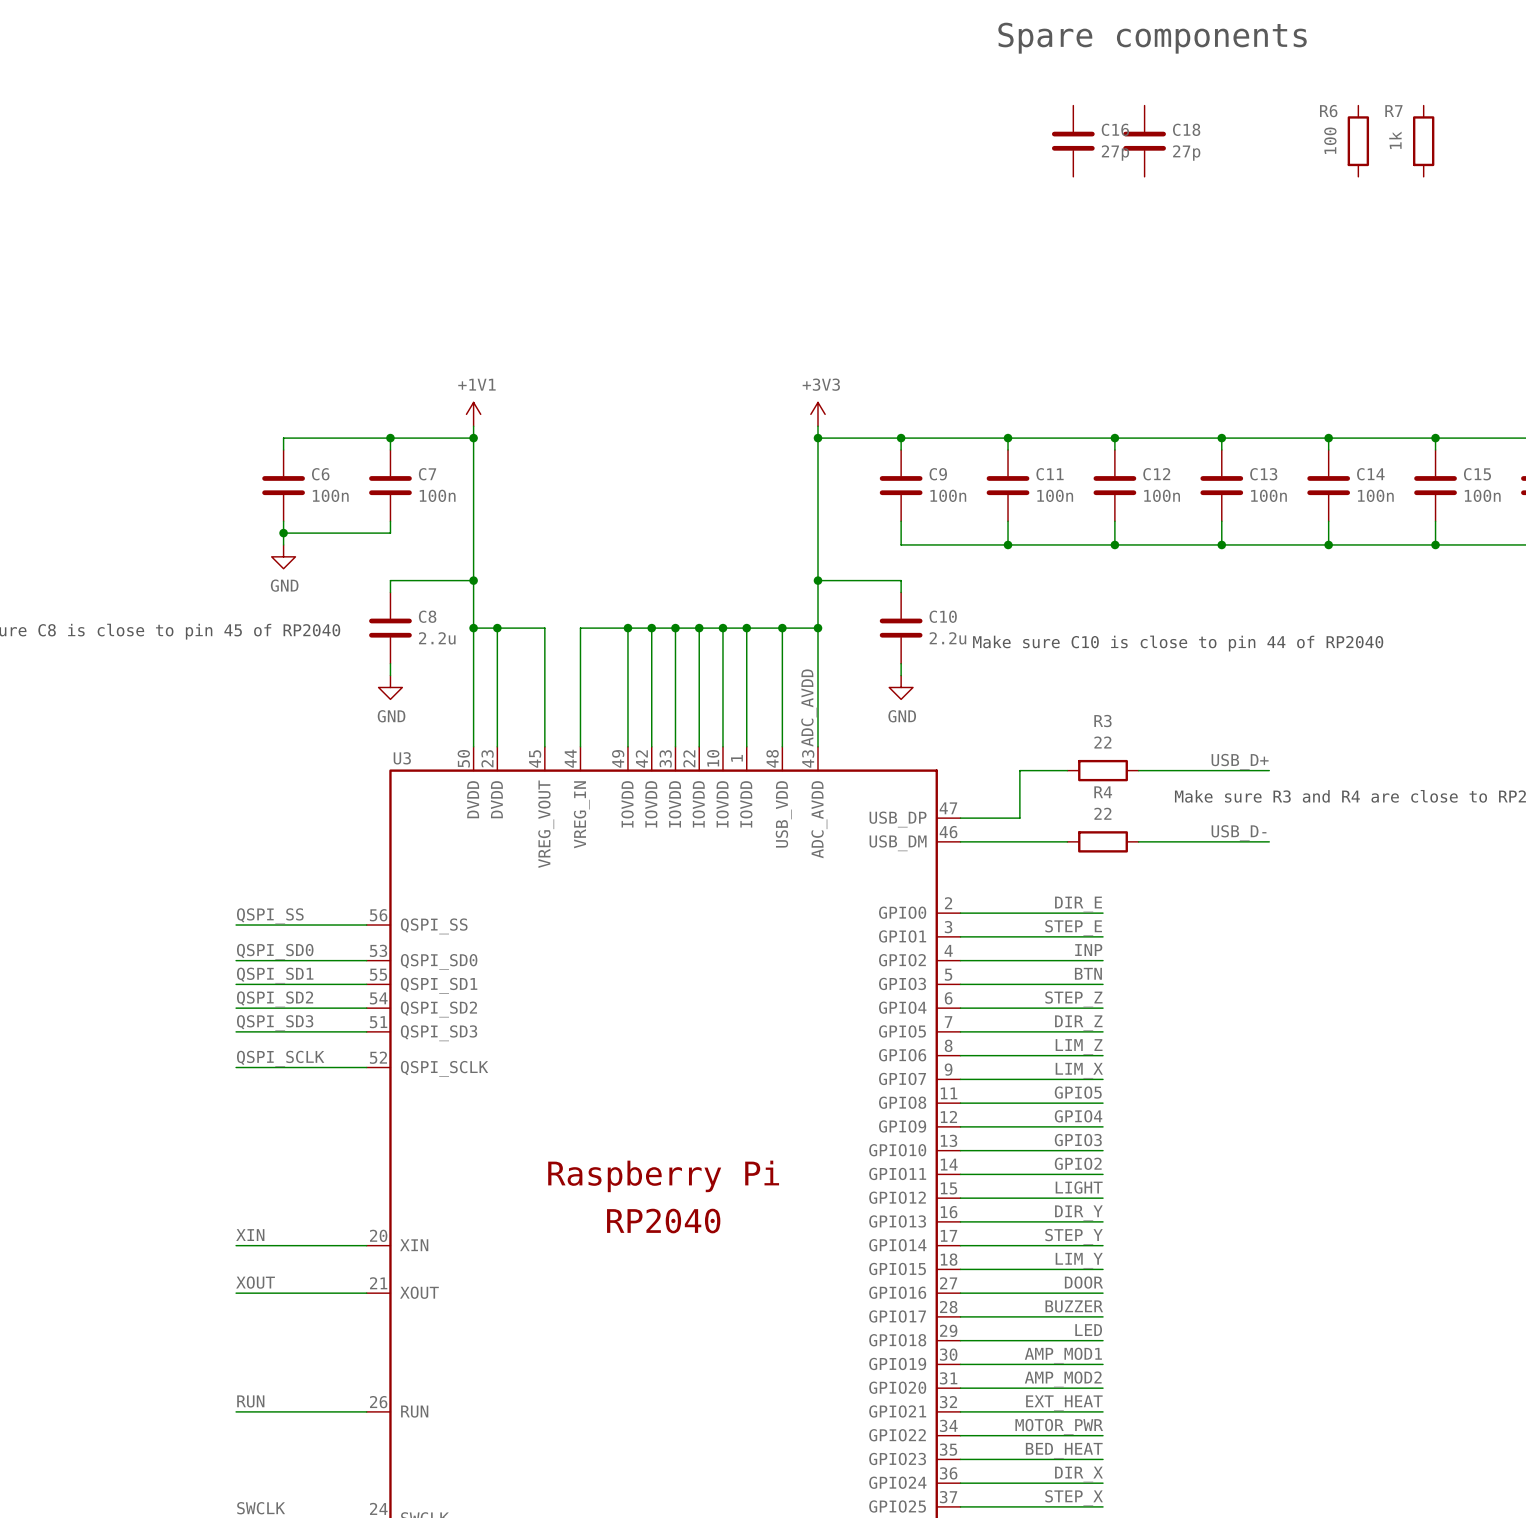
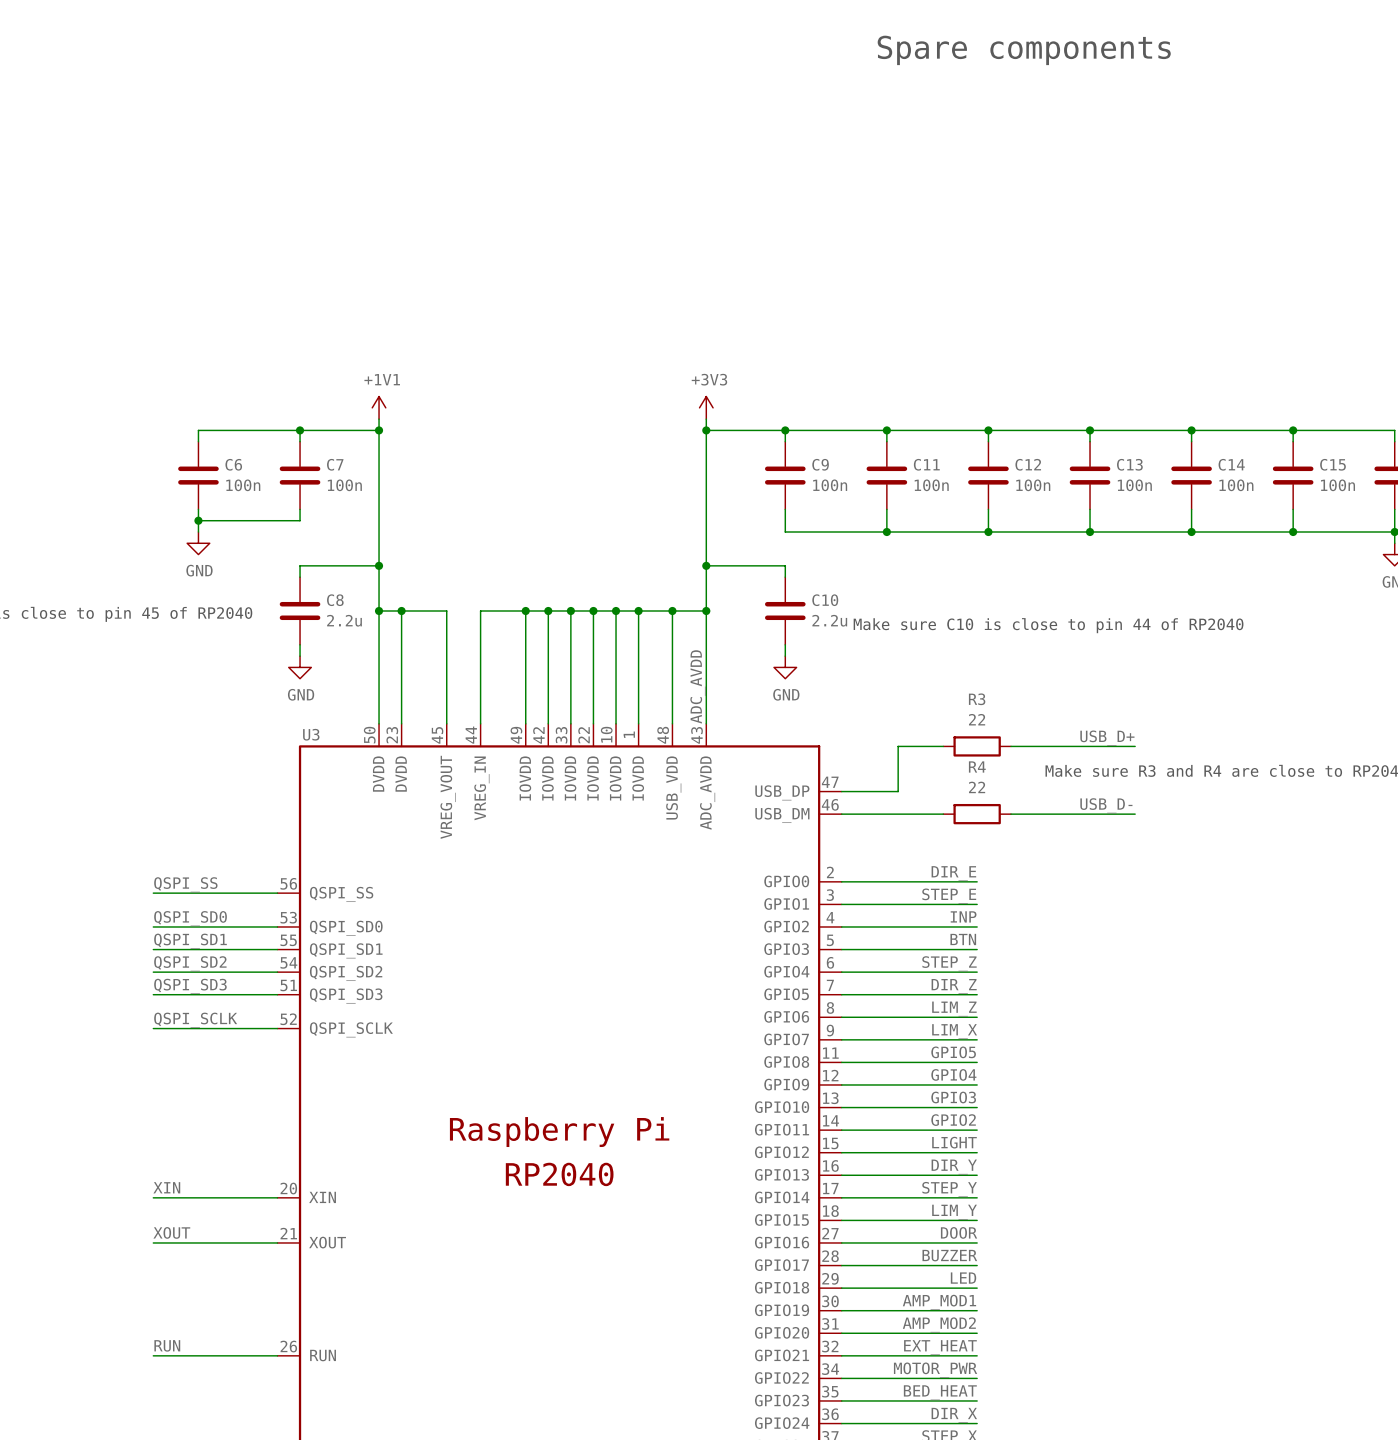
C16: 27p (1073, 141) -> none
C18: 27p (1144, 141) -> none
R6: 100 (1358, 141) -> none
R7: 1k (1423, 141) -> none

